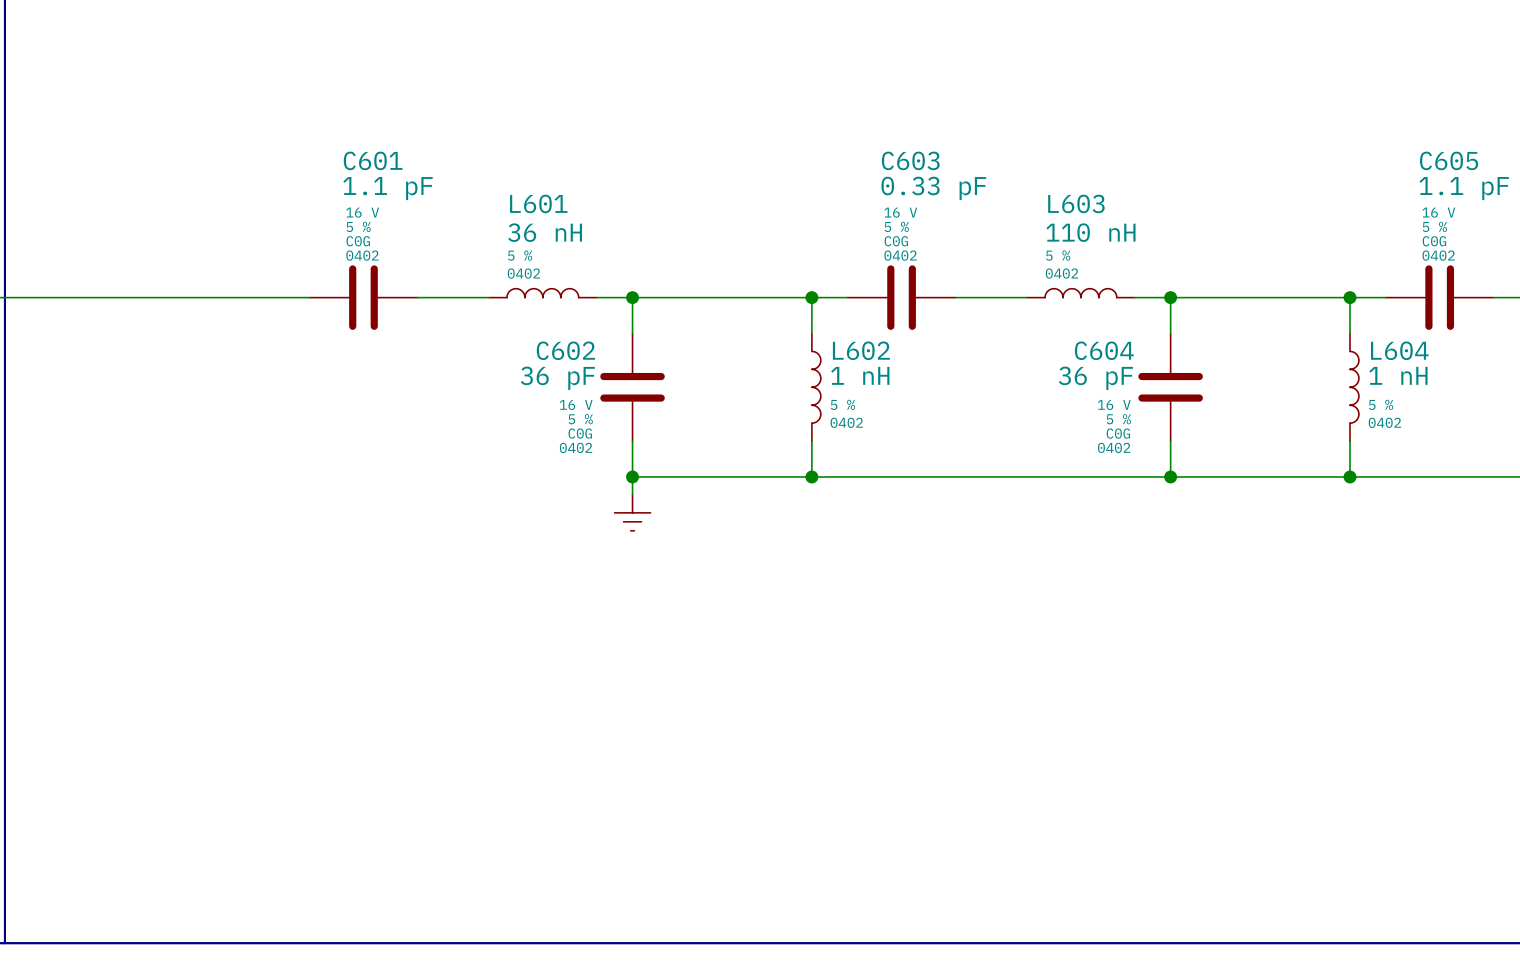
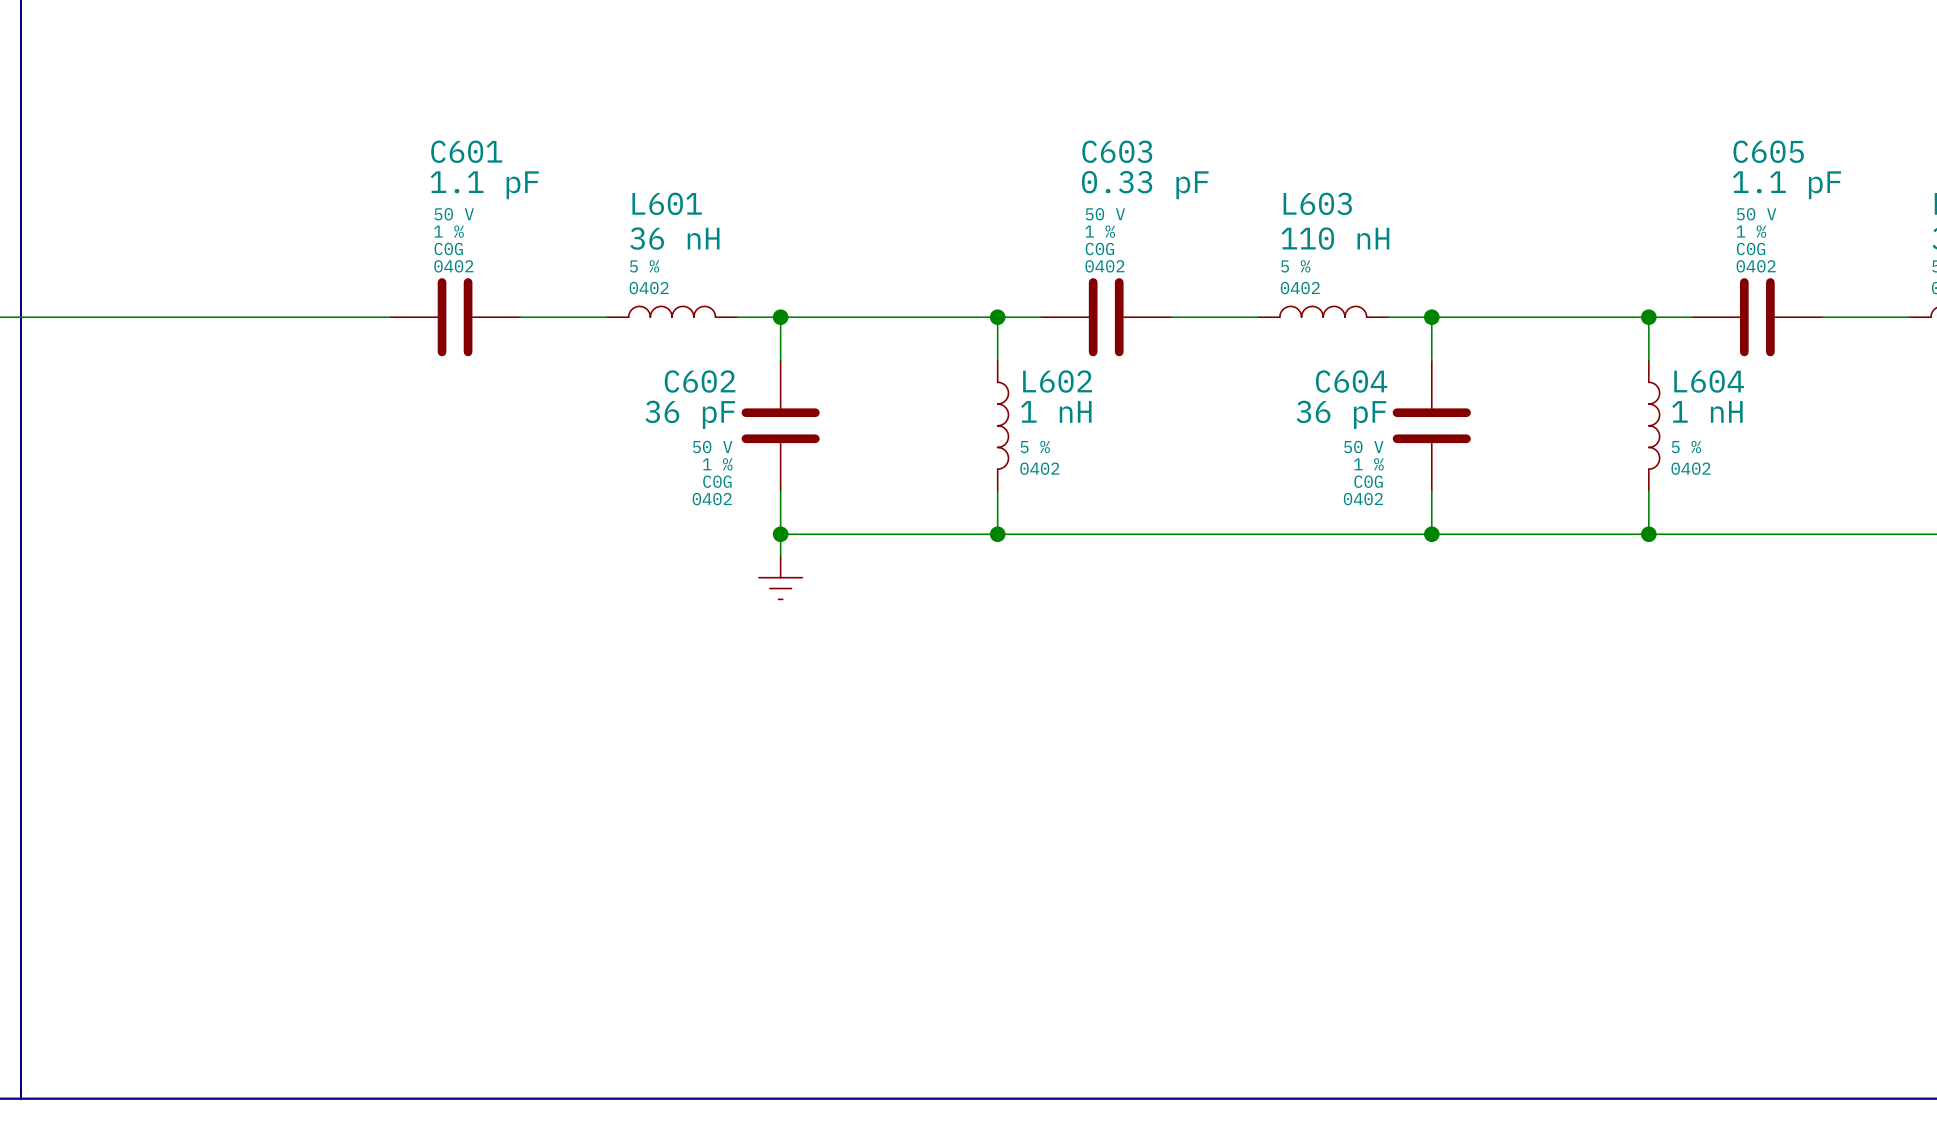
C601 text: 16 V (362, 212) -> 50 V (454, 214)
C603 text: 16 V (900, 212) -> 50 V (1105, 214)
C605 text: 16 V (1438, 212) -> 50 V (1756, 214)
C601 text: 5 % (358, 226) -> 1 % (449, 231)
C603 text: 5 % (896, 226) -> 1 % (1100, 231)
C605 text: 5 % (1434, 226) -> 1 % (1751, 231)
C602 text: 16 V (576, 404) -> 50 V (712, 446)
C604 text: 16 V (1114, 404) -> 50 V (1363, 446)
C602 text: 5 % (580, 419) -> 1 % (717, 464)
C604 text: 5 % (1118, 419) -> 1 % (1368, 464)

